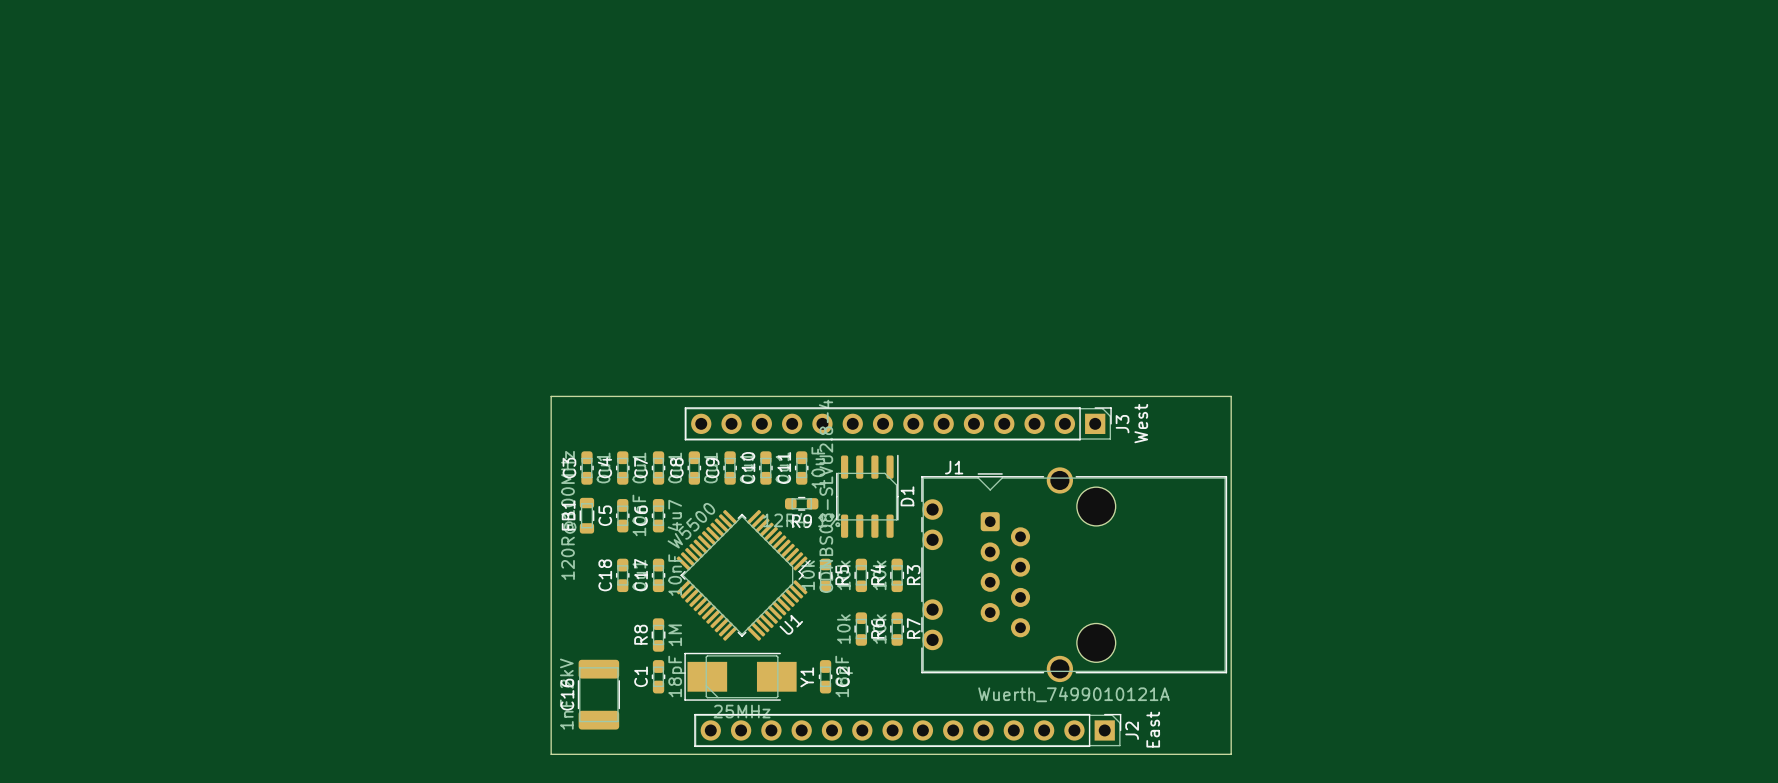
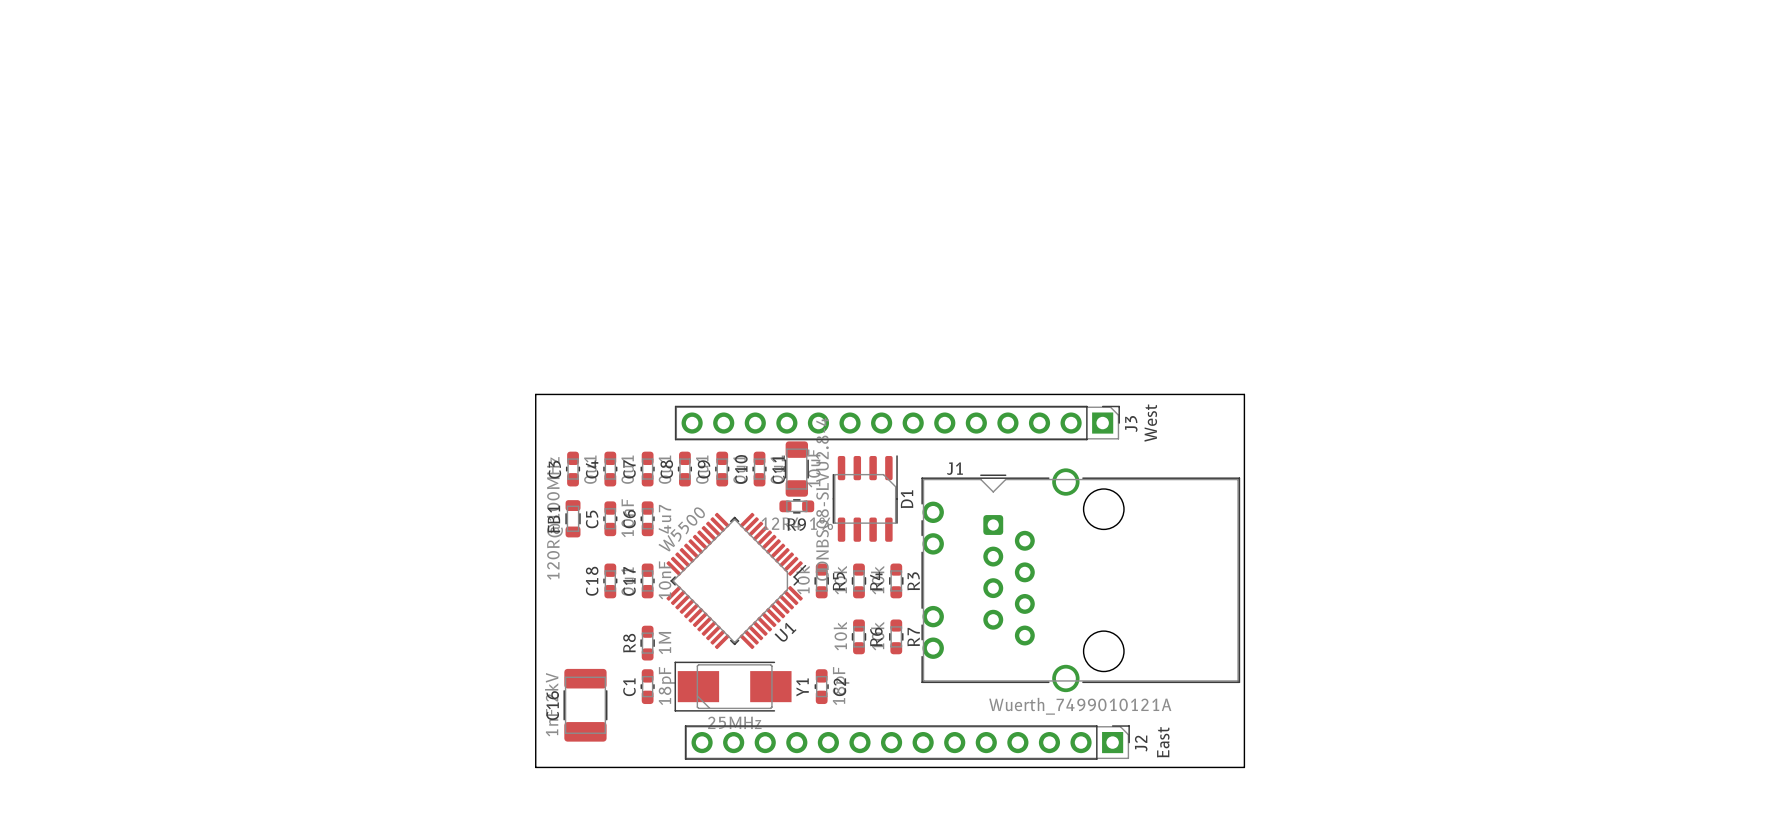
C11 footprint: [794, 451, 809, 485] -> [784, 441, 809, 497]

